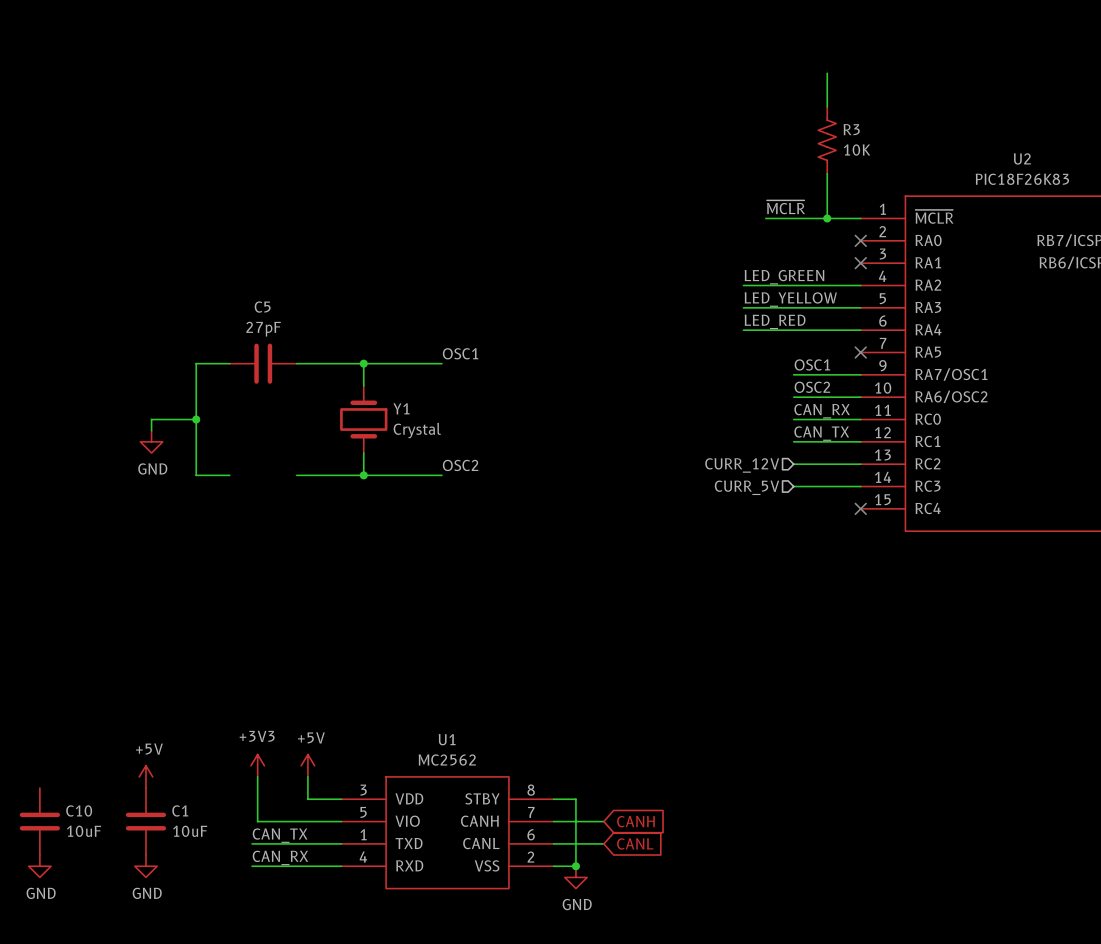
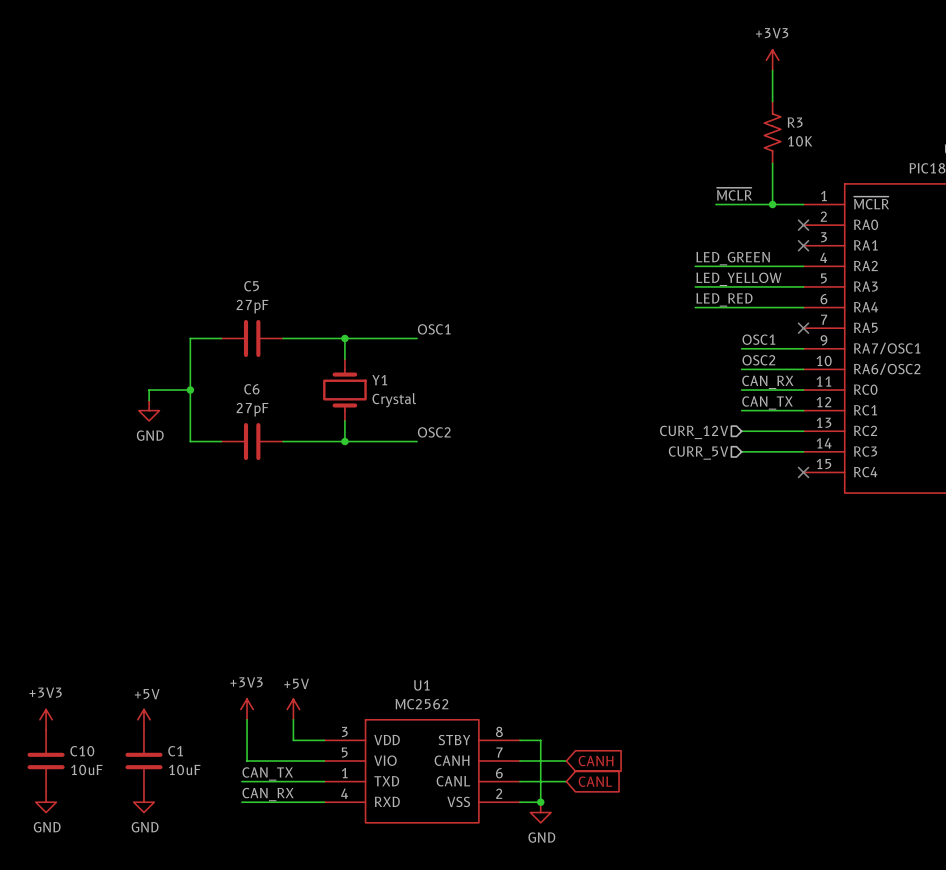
power symbol: none -> +3V3 (772, 60)
C6: none -> 27pF (252, 441)
power symbol: none -> +3V3 (46, 719)

